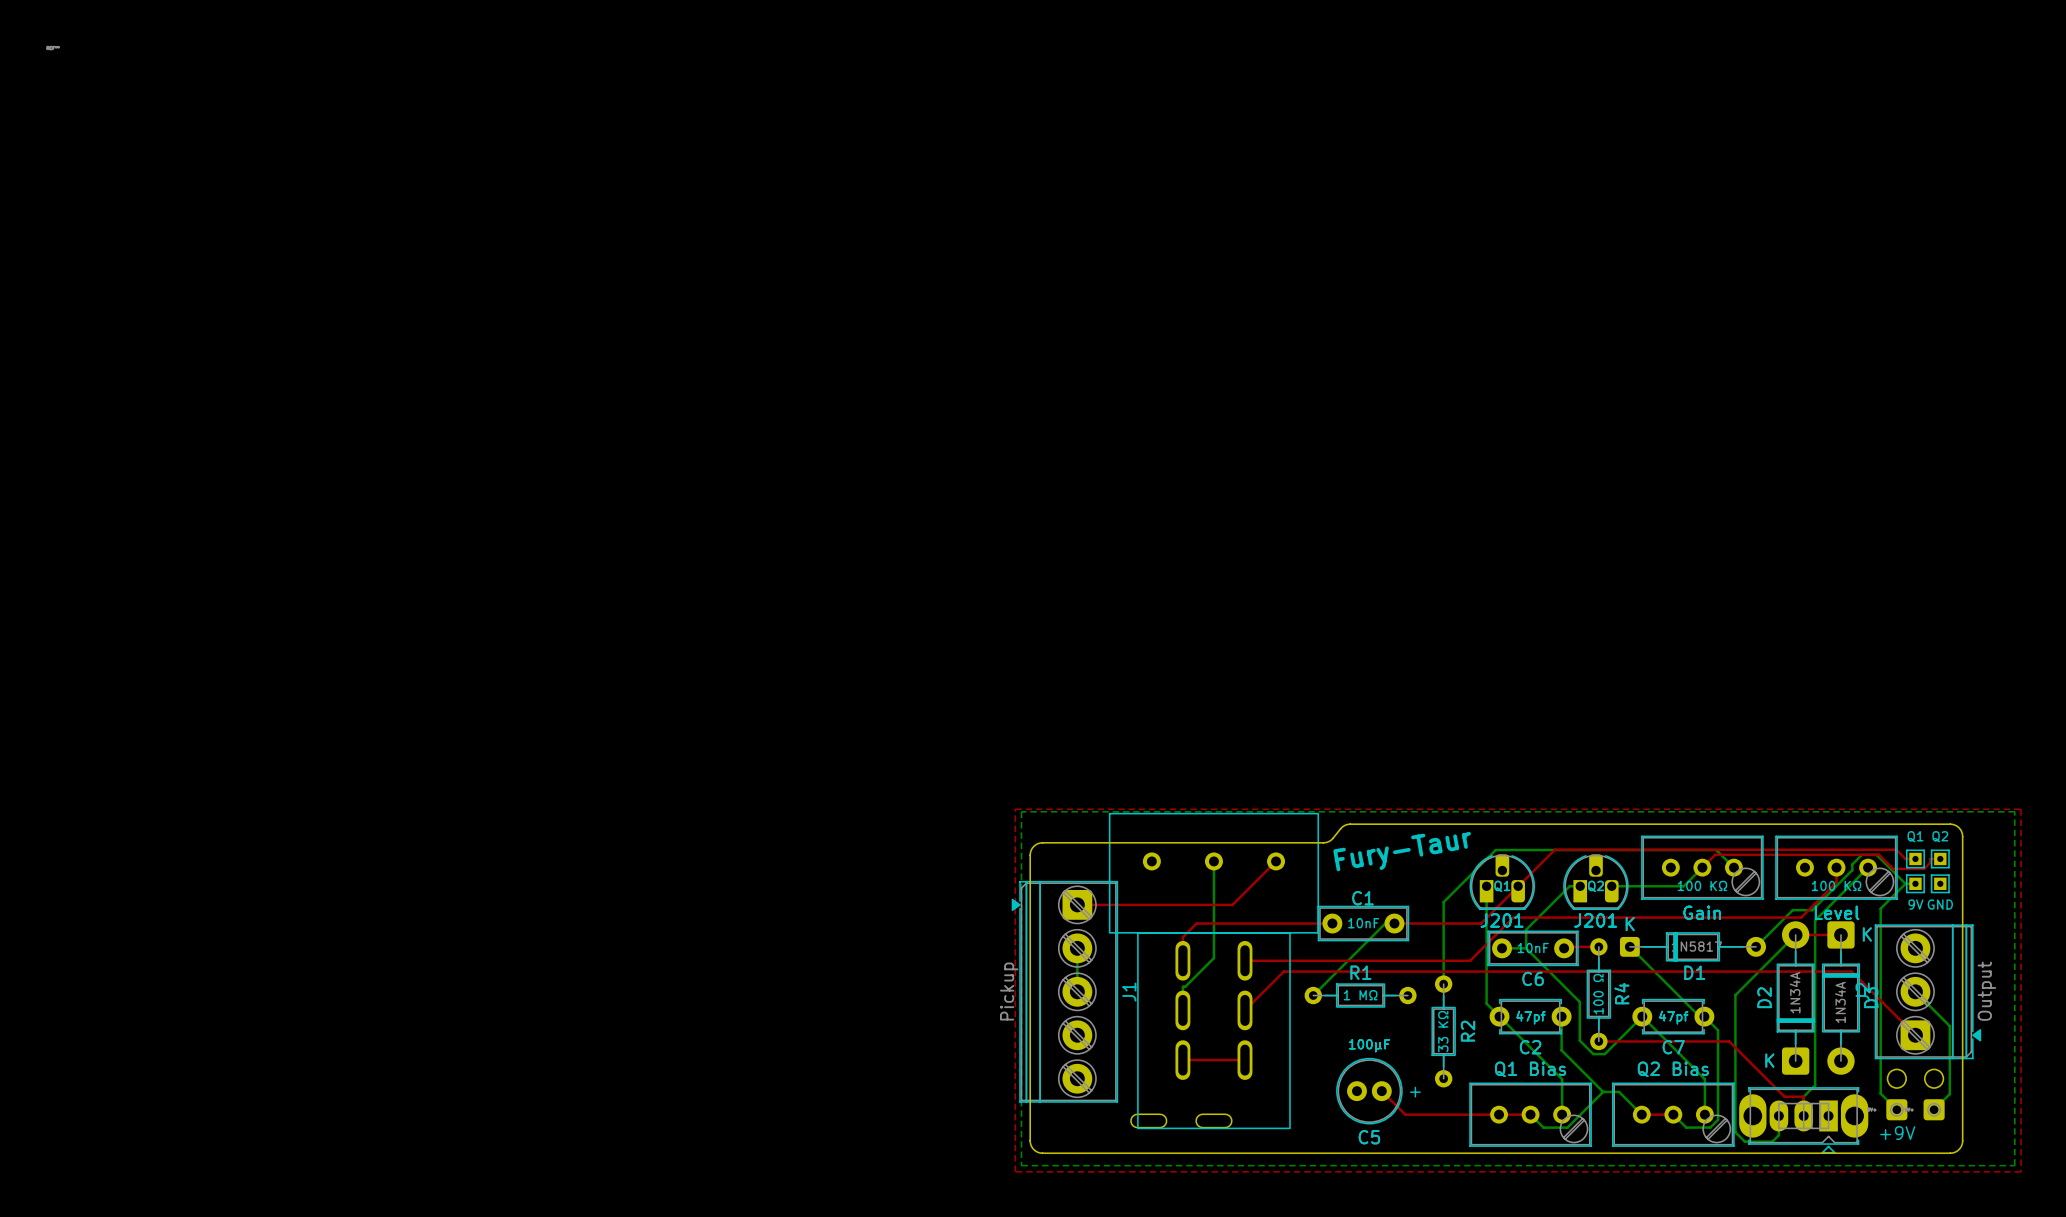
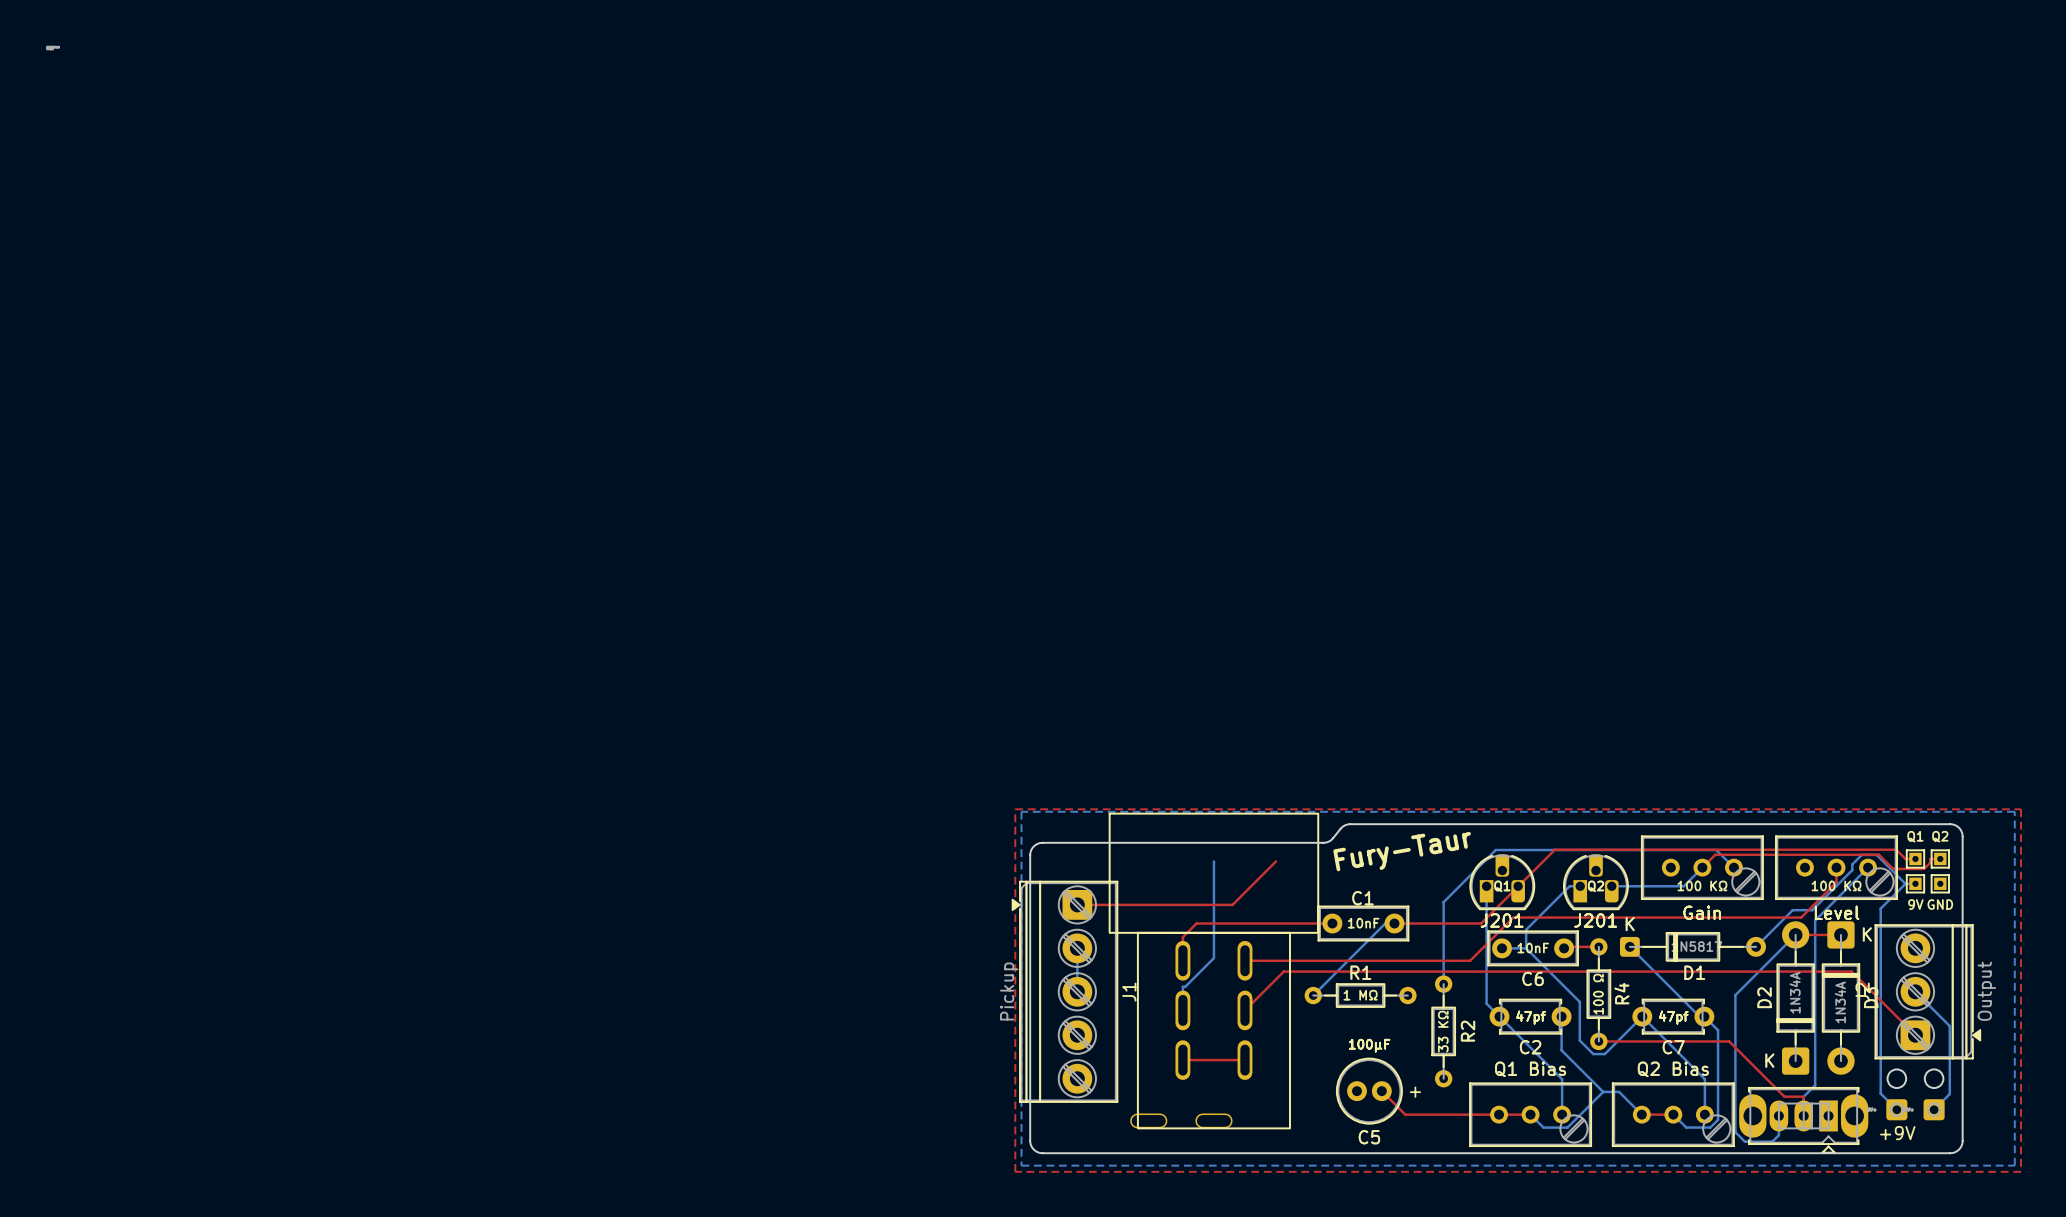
part footprint: [1109, 813, 1319, 1130] -> [1109, 813, 1319, 1130]

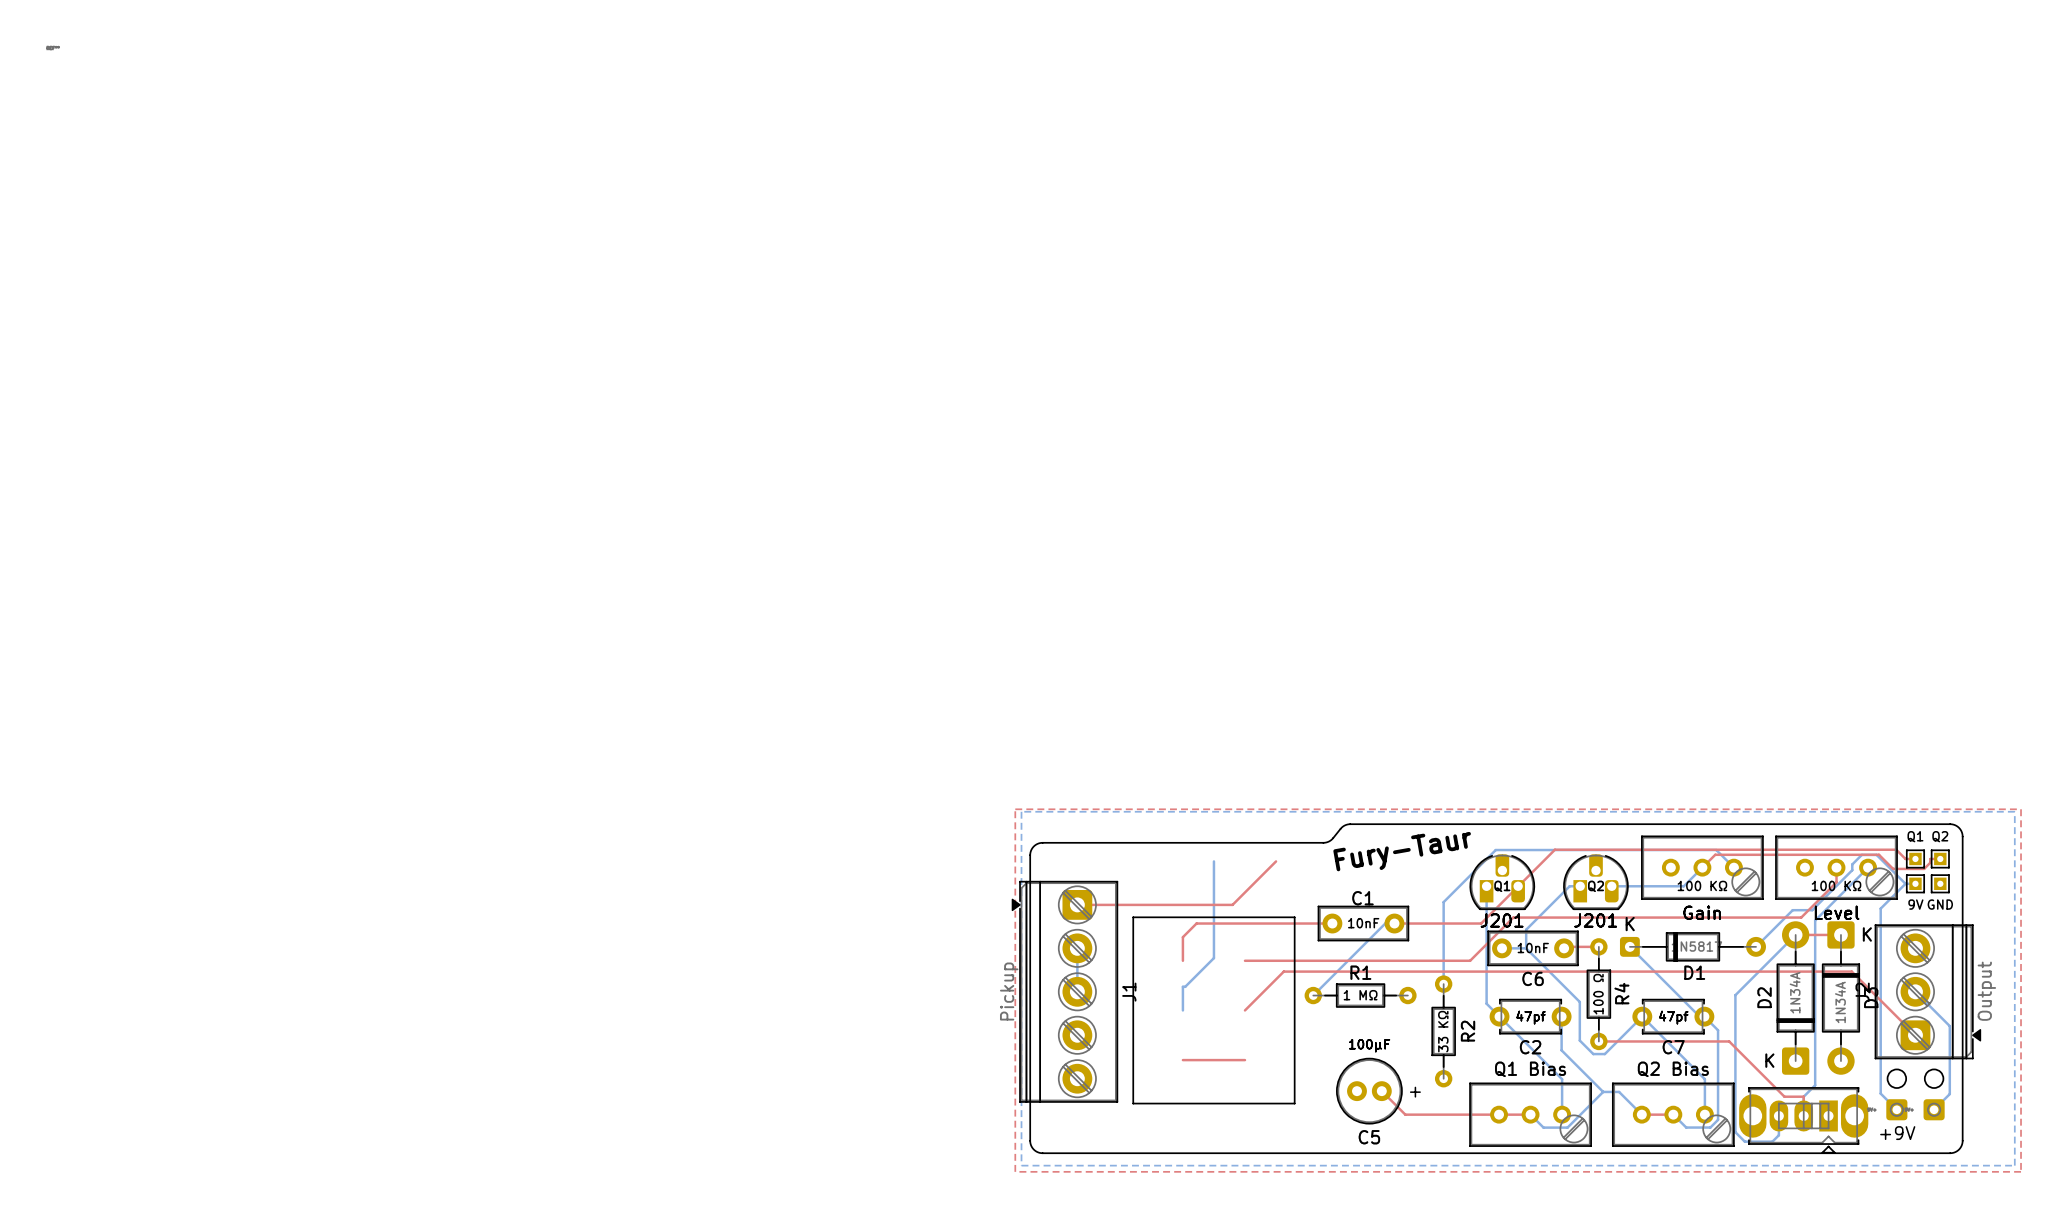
line: none -> (1133, 917) (1294, 917) (1294, 1103) (1133, 1103) (1133, 917)
part: (1213, 971) -> none

